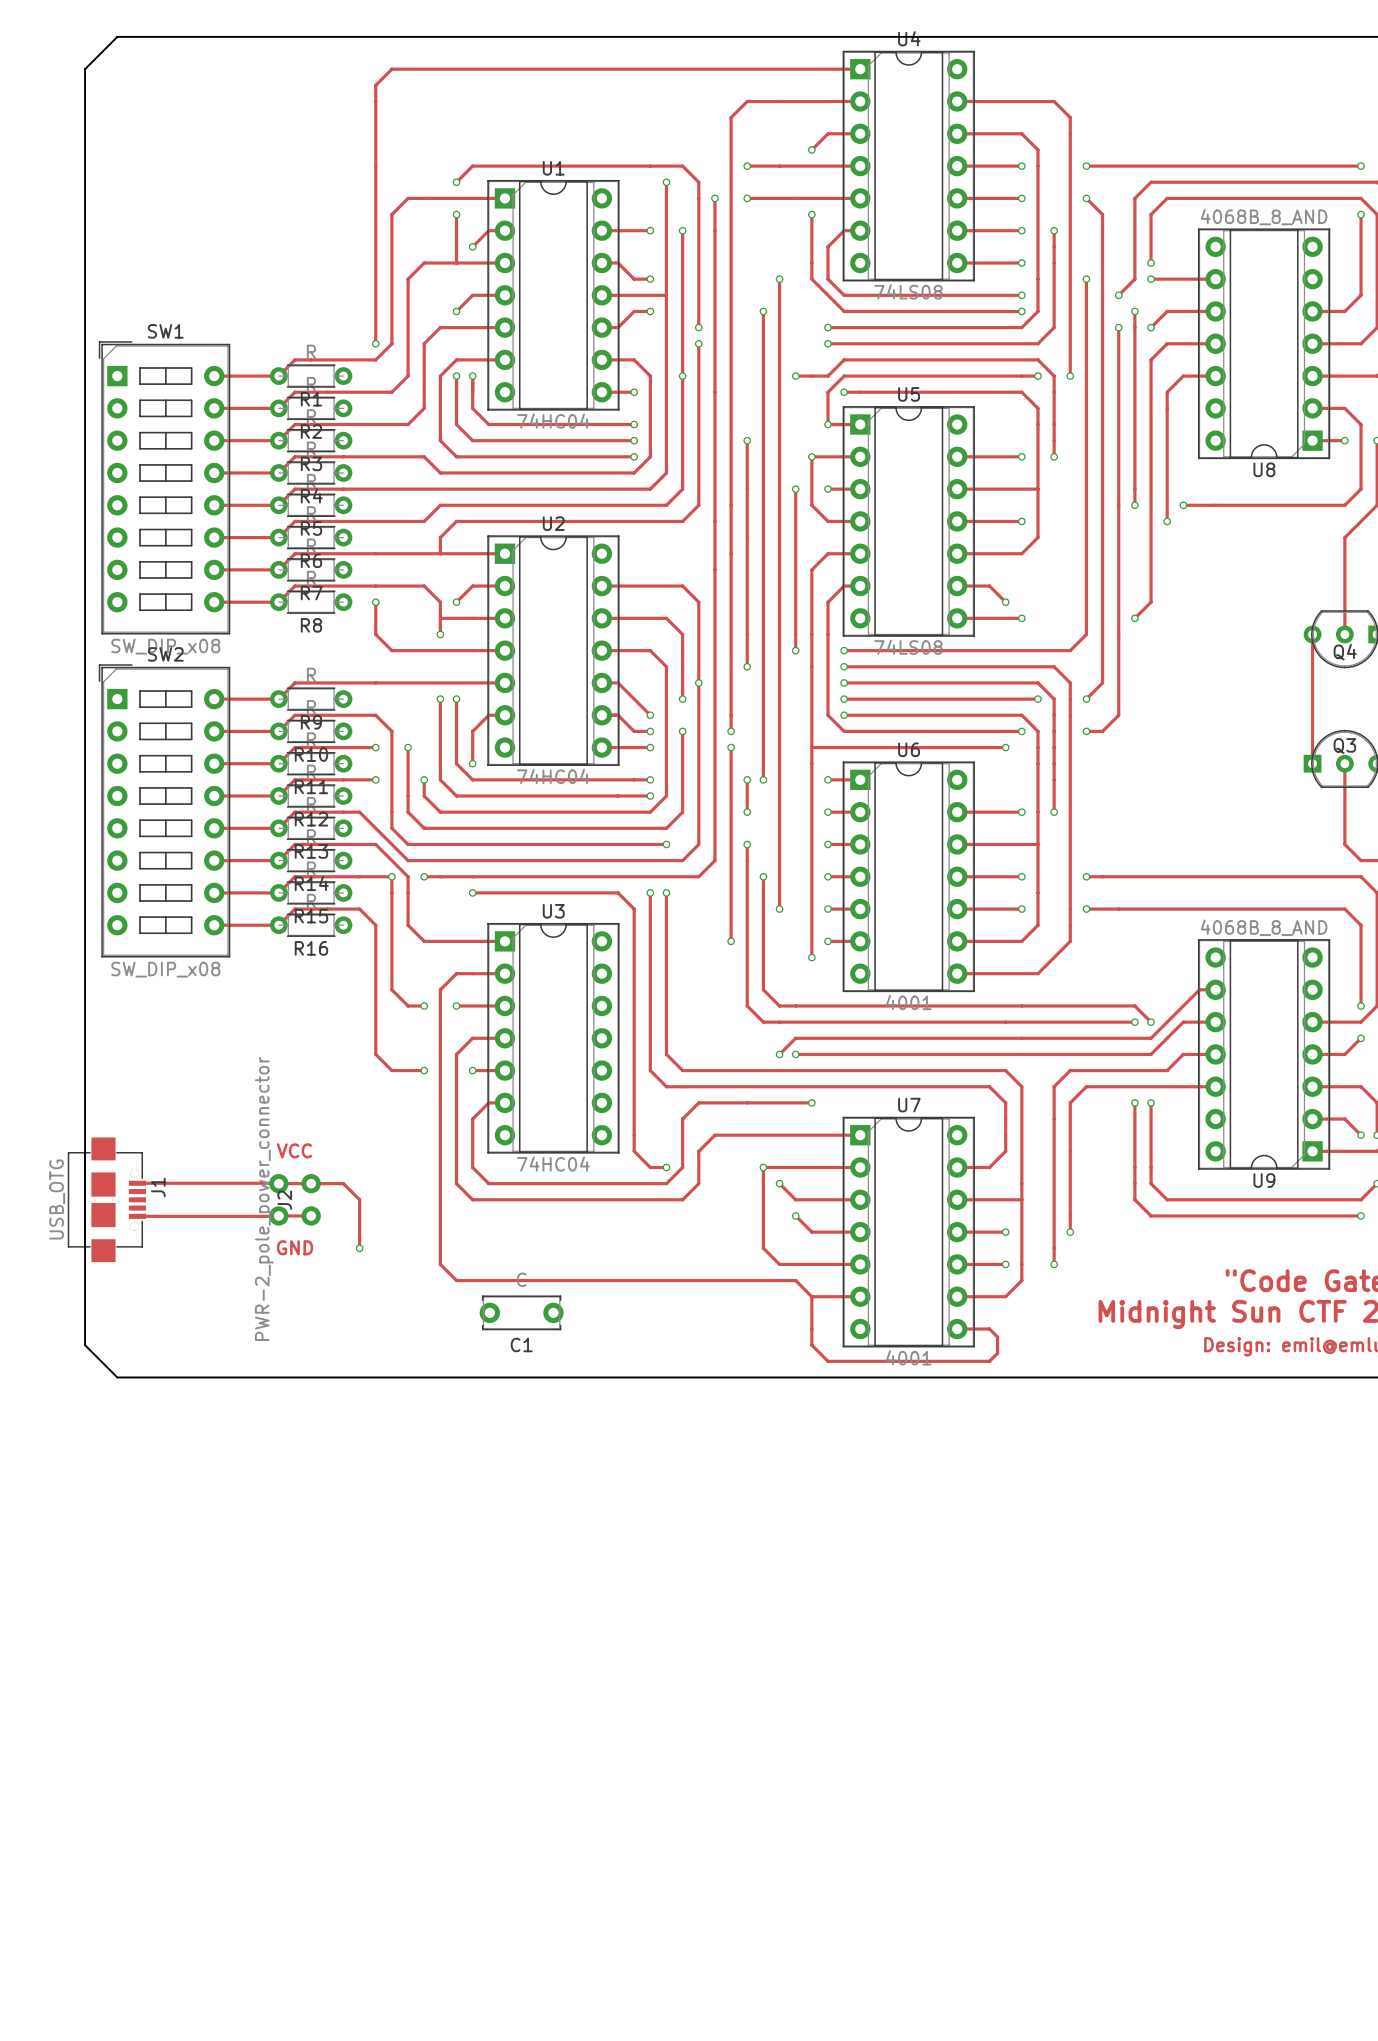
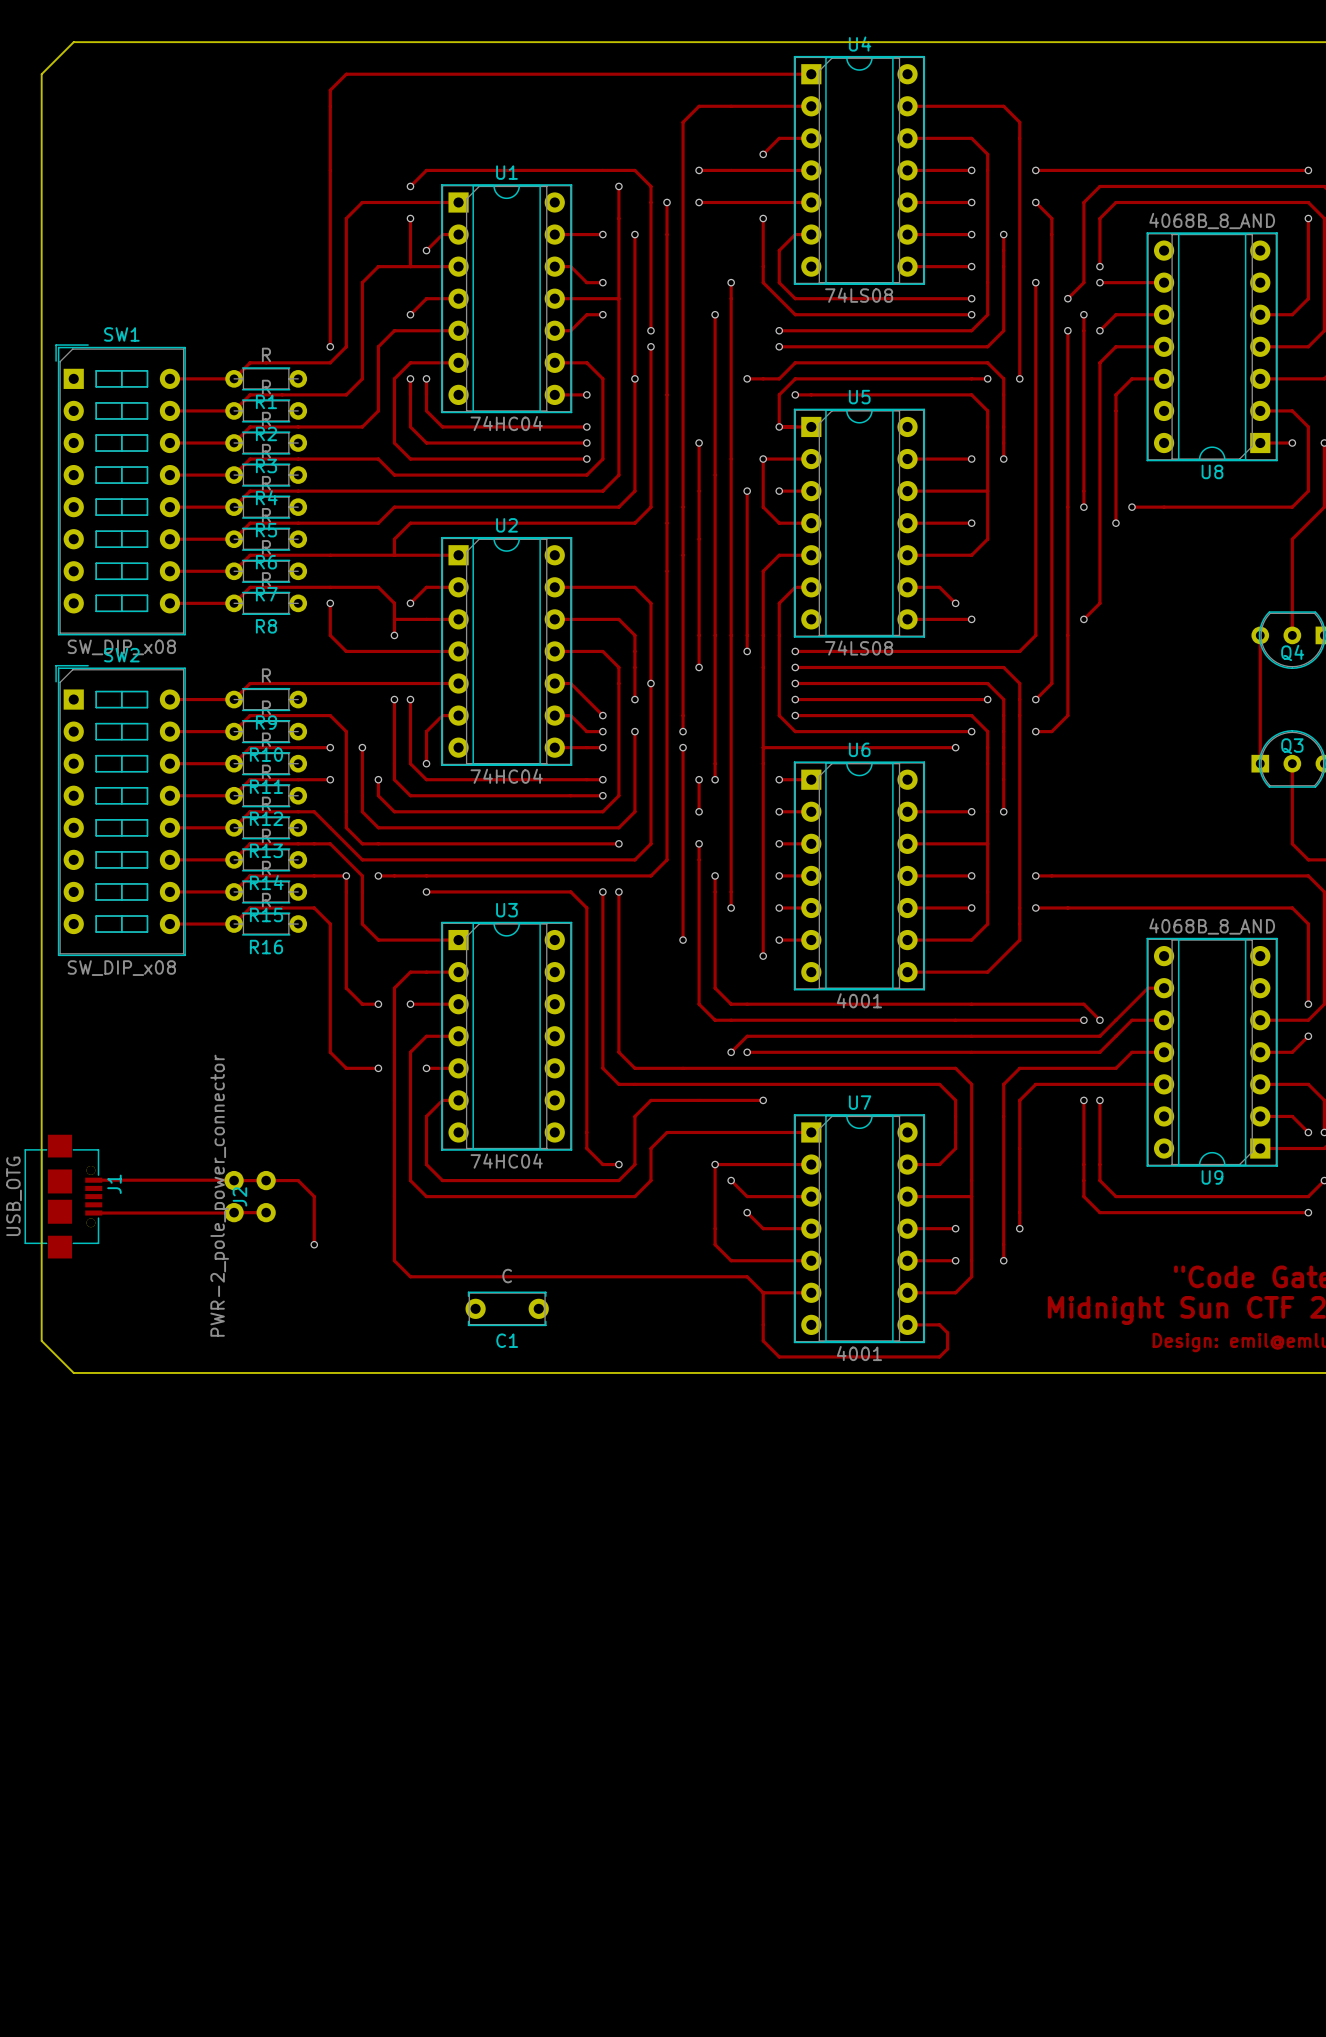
text: VCC (294, 1150) -> none
text: GND (295, 1247) -> none
C1 position: (521, 1312) -> (507, 1308)

